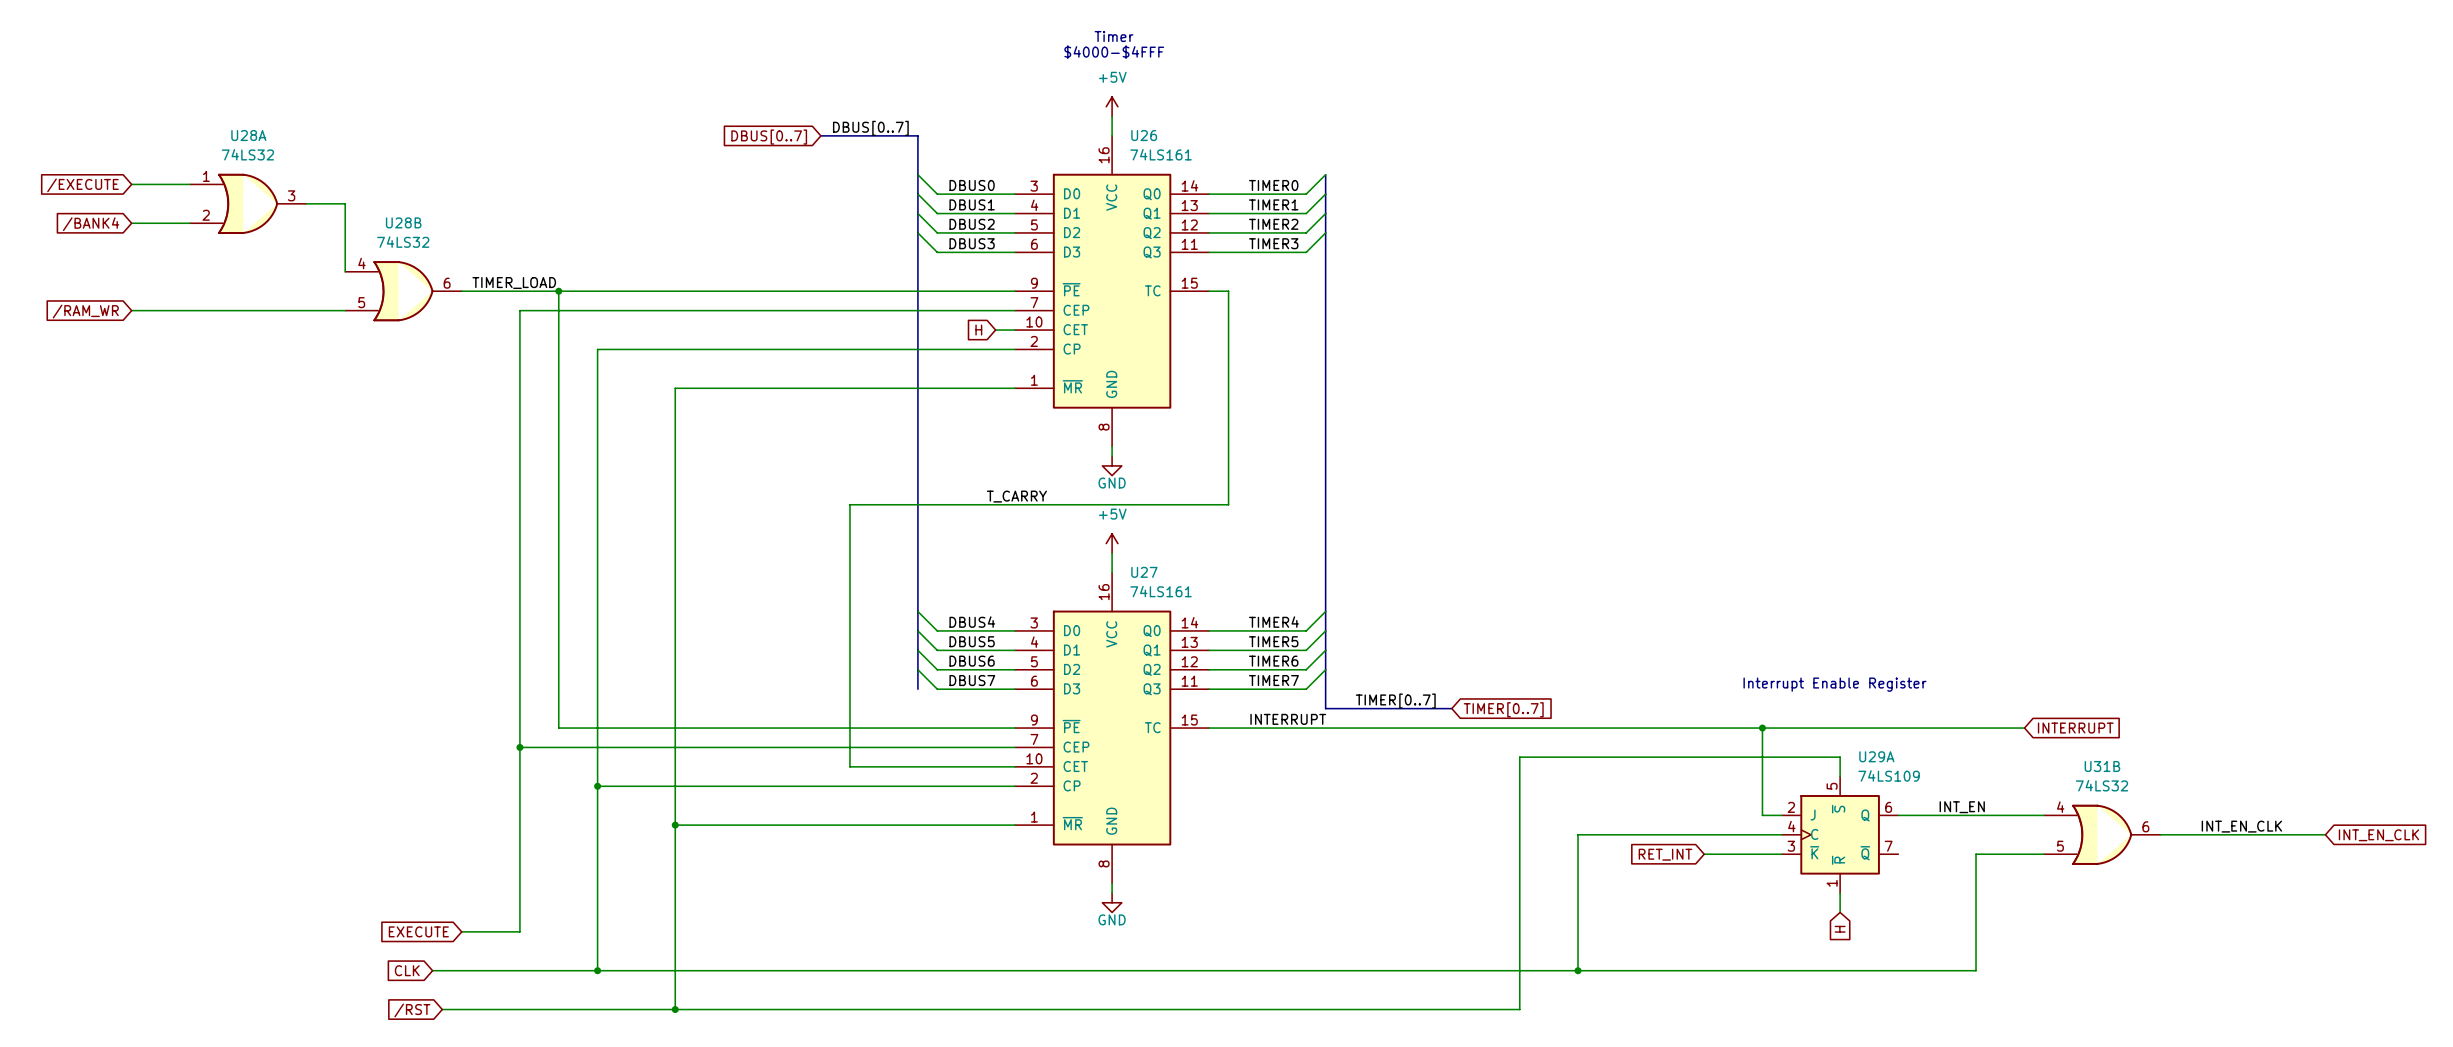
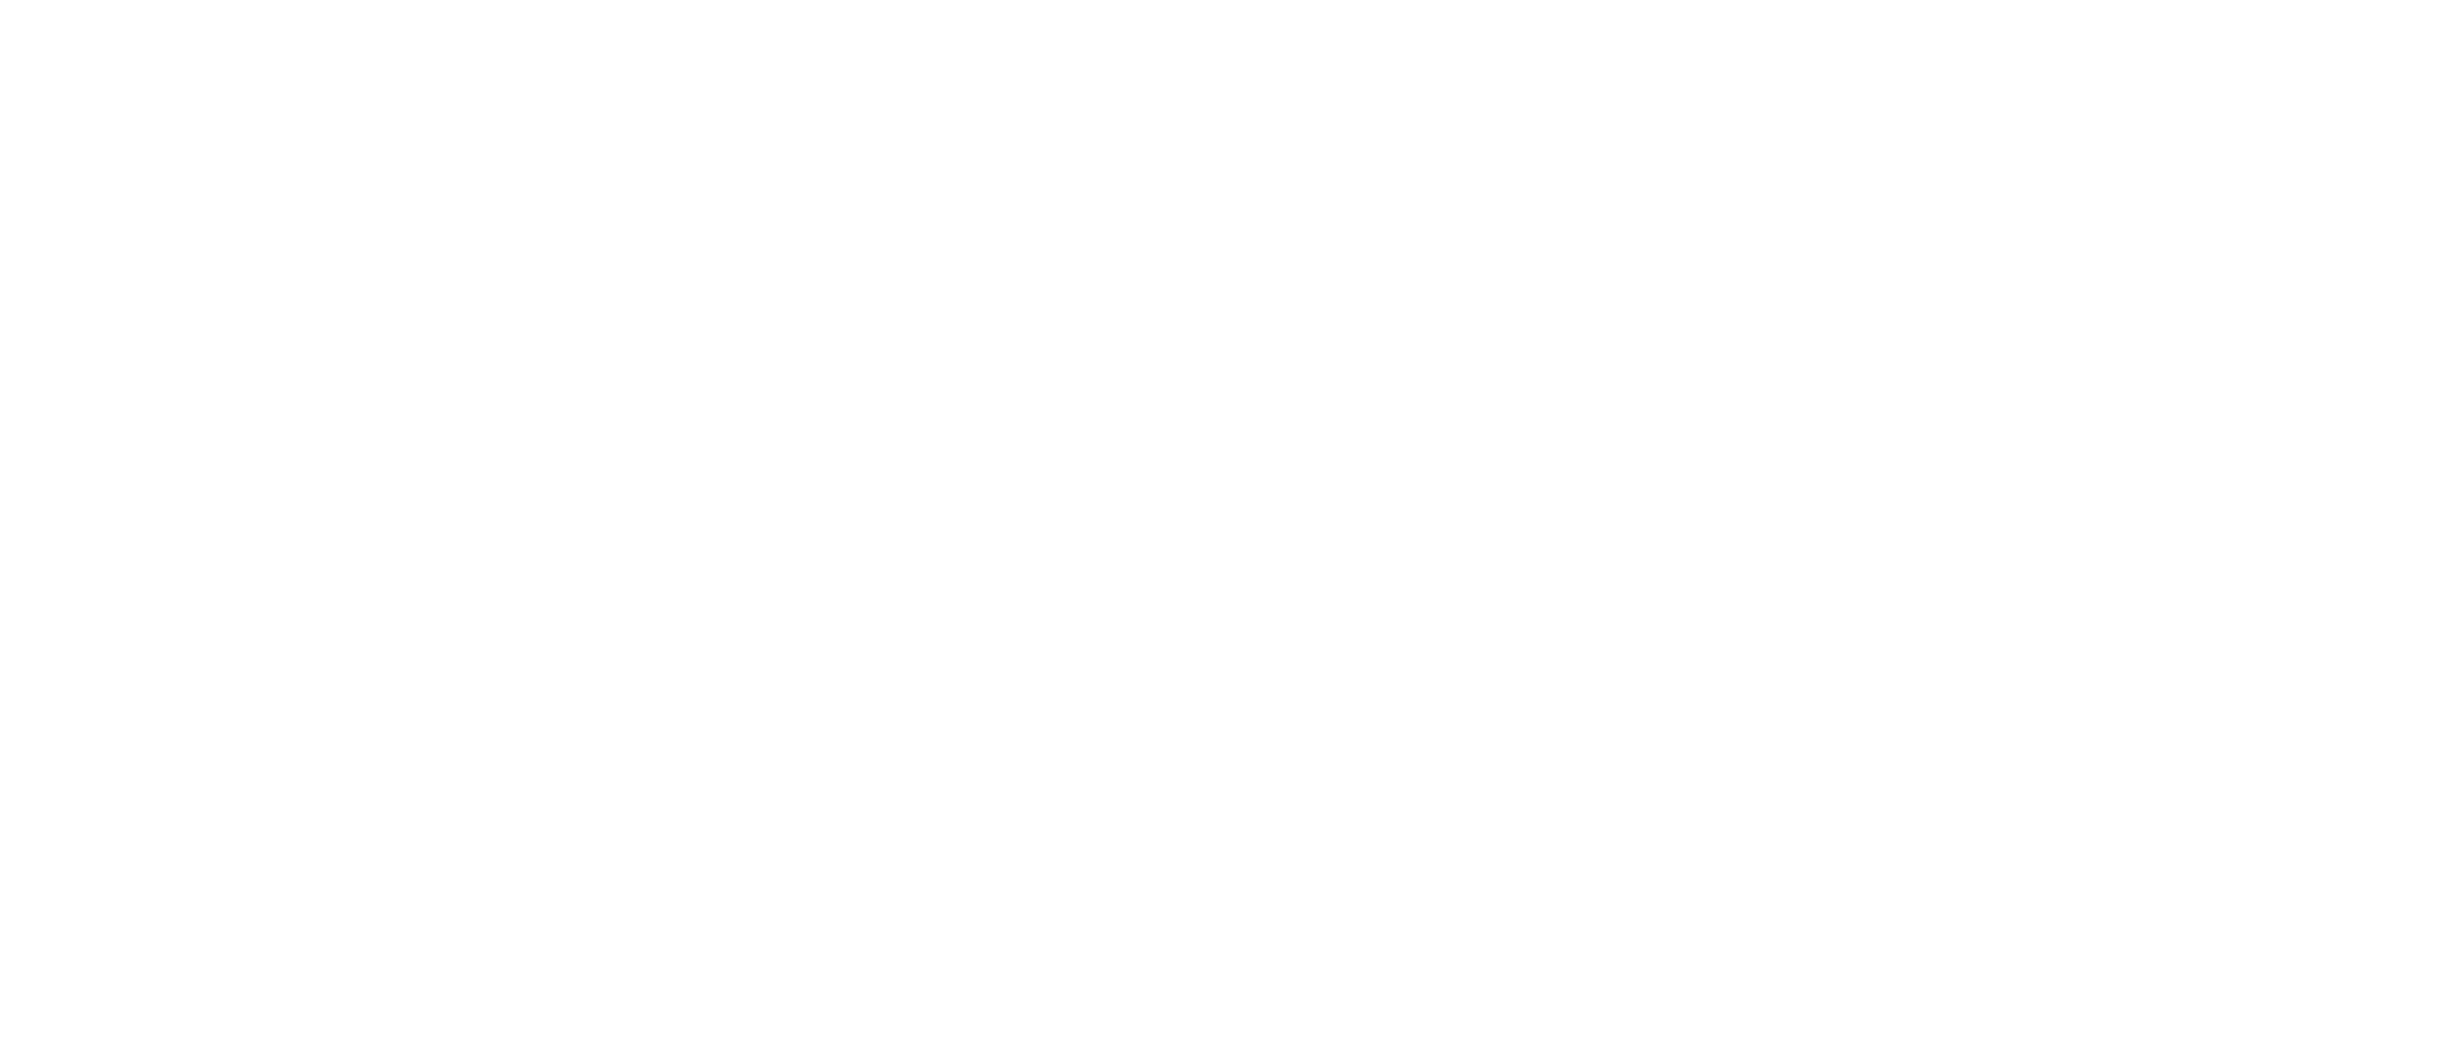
text: Timer (1114, 36) -> none
text: $4000-$4FFF (1114, 52) -> none
power symbol: +5V (1112, 106) -> none
wire: (1112, 116) (1112, 135) -> none
label: DBUS[0..7] (870, 128) -> none
bus: (820, 135) (917, 135) (917, 689) -> none
global label: DBUS[0..7] (769, 137) -> none
wire: (917, 174) (937, 194) (1015, 194) -> none
wire: (1325, 174) (1306, 194) (1209, 194) -> none
bus: (1325, 174) (1325, 708) (1451, 708) -> none
wire: (131, 184) (189, 184) -> none
global label: /EXECUTE (82, 185) -> none
label: DBUS0 (972, 185) -> none
label: TIMER0 (1273, 185) -> none
wire: (917, 194) (937, 213) (1015, 213) -> none
wire: (1325, 194) (1306, 213) (1209, 213) -> none
U28A: 74LS32 (248, 203) -> none
wire: (306, 203) (345, 203) (345, 271) -> none
label: DBUS1 (972, 204) -> none
label: TIMER1 (1273, 204) -> none
wire: (917, 213) (937, 232) (1015, 232) -> none
wire: (1325, 213) (1306, 232) (1209, 232) -> none
wire: (131, 223) (189, 223) -> none
global label: /BANK4 (91, 224) -> none
label: DBUS2 (972, 224) -> none
label: TIMER2 (1273, 224) -> none
wire: (917, 232) (937, 252) (1015, 252) -> none
wire: (1325, 232) (1306, 252) (1209, 252) -> none
label: DBUS3 (972, 243) -> none
label: TIMER3 (1273, 243) -> none
label: TIMER_LOAD (514, 283) -> none
U28B: 74LS32 (403, 291) -> none
wire: (461, 291) (1015, 291) -> none
wire: (558, 291) (558, 728) (1015, 728) -> none
junction: (558, 291) -> none
U26: 74LS161 (1112, 291) -> none
wire: (1209, 291) (1228, 291) (1228, 504) (849, 504) (849, 766) (1015, 766) -> none
wire: (131, 310) (345, 310) -> none
wire: (1015, 310) (519, 310) (519, 931) (461, 931) -> none
global label: /RAM_WR (85, 311) -> none
global label: H (978, 330) -> none
wire: (995, 330) (1015, 330) -> none
wire: (1015, 349) (597, 349) (597, 970) -> none
wire: (1015, 388) (675, 388) (675, 1009) -> none
wire: (1112, 446) (1112, 456) -> none
power symbol: GND (1112, 465) -> none
label: T_CARRY (1016, 496) -> none
power symbol: +5V (1112, 543) -> none
wire: (1112, 553) (1112, 572) -> none
wire: (917, 611) (937, 630) (1015, 630) -> none
wire: (1325, 611) (1306, 630) (1209, 630) -> none
label: DBUS4 (972, 622) -> none
label: TIMER4 (1273, 622) -> none
wire: (917, 630) (937, 650) (1015, 650) -> none
wire: (1325, 630) (1306, 650) (1209, 650) -> none
label: DBUS5 (972, 641) -> none
label: TIMER5 (1273, 641) -> none
wire: (917, 650) (937, 669) (1015, 669) -> none
wire: (1325, 650) (1306, 669) (1209, 669) -> none
label: DBUS6 (972, 661) -> none
label: TIMER6 (1273, 661) -> none
wire: (917, 669) (937, 689) (1015, 689) -> none
wire: (1325, 669) (1306, 689) (1209, 689) -> none
label: DBUS7 (972, 680) -> none
label: TIMER7 (1273, 680) -> none
text: Interrupt Enable Register (1834, 684) -> none
label: TIMER[0..7] (1395, 701) -> none
global label: TIMER[0..7] (1503, 709) -> none
label: INTERRUPT (1288, 719) -> none
U27: 74LS161 (1112, 728) -> none
wire: (1209, 728) (2024, 728) -> none
wire: (1762, 728) (1762, 815) (1781, 815) -> none
junction: (1762, 728) -> none
global label: INTERRUPT (2075, 728) -> none
wire: (519, 747) (1015, 747) -> none
junction: (519, 747) -> none
wire: (1840, 776) (1840, 757) (1519, 757) (1519, 1009) (442, 1009) -> none
wire: (597, 786) (1015, 786) -> none
junction: (597, 786) -> none
label: INT_EN (1962, 807) -> none
wire: (1898, 815) (2043, 815) -> none
wire: (675, 825) (1015, 825) -> none
junction: (675, 825) -> none
label: INT_EN_CLK (2241, 826) -> none
wire: (1781, 834) (1578, 834) (1578, 970) -> none
U29A: 74LS109 (1840, 834) -> none
U31B: 74LS32 (2102, 834) -> none
wire: (2160, 834) (2325, 834) -> none
global label: INT_EN_CLK (2378, 835) -> none
global label: RET_INT (1665, 854) -> none
wire: (1704, 854) (1781, 854) -> none
wire: (2043, 854) (1976, 854) (1976, 970) (432, 970) -> none
wire: (1112, 883) (1112, 893) -> none
wire: (1840, 893) (1840, 912) -> none
power symbol: GND (1112, 902) -> none
global label: H (1840, 929) -> none
global label: EXECUTE (418, 931) -> none
global label: CLK (407, 970) -> none
junction: (597, 970) -> none
junction: (1578, 970) -> none
junction: (675, 1009) -> none
global label: /RST (412, 1010) -> none

